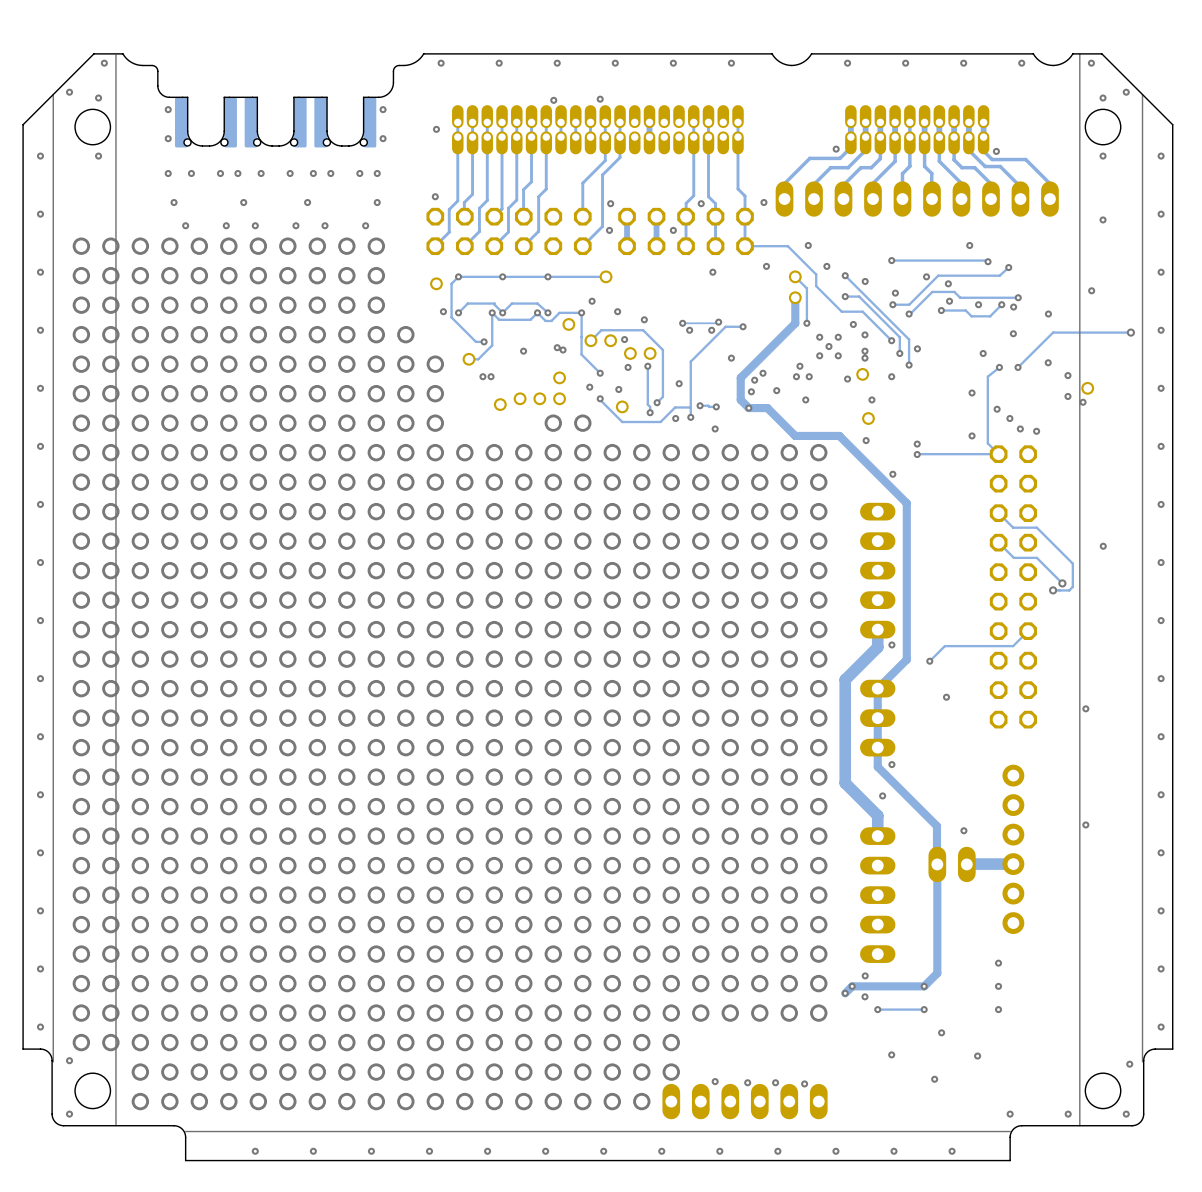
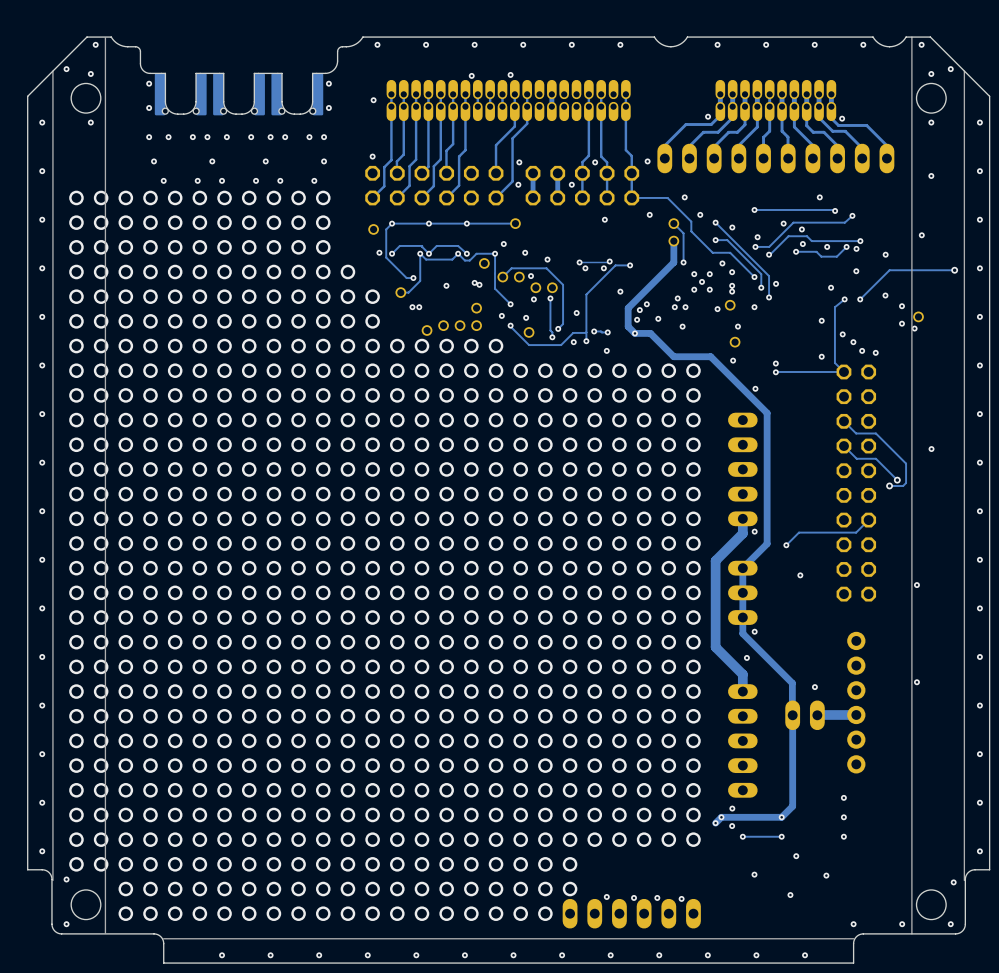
via: none -> (397, 346)
via: none -> (421, 346)
via: none -> (446, 346)

